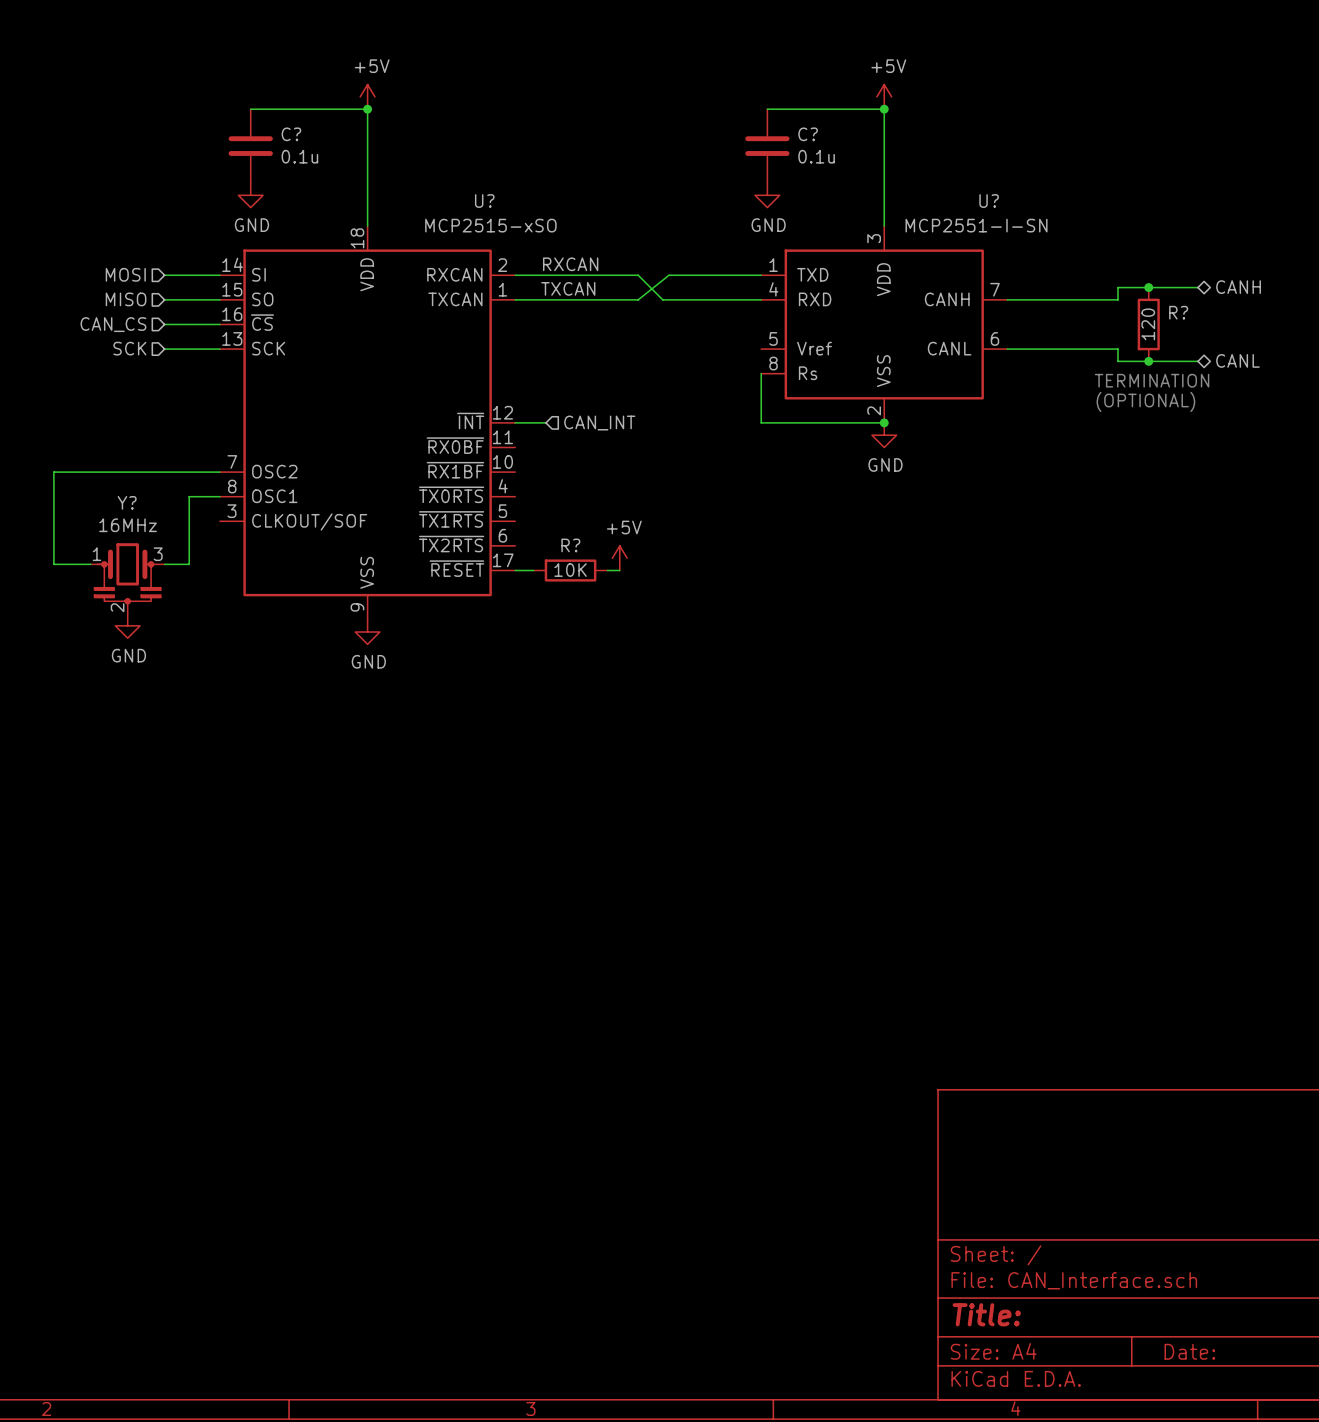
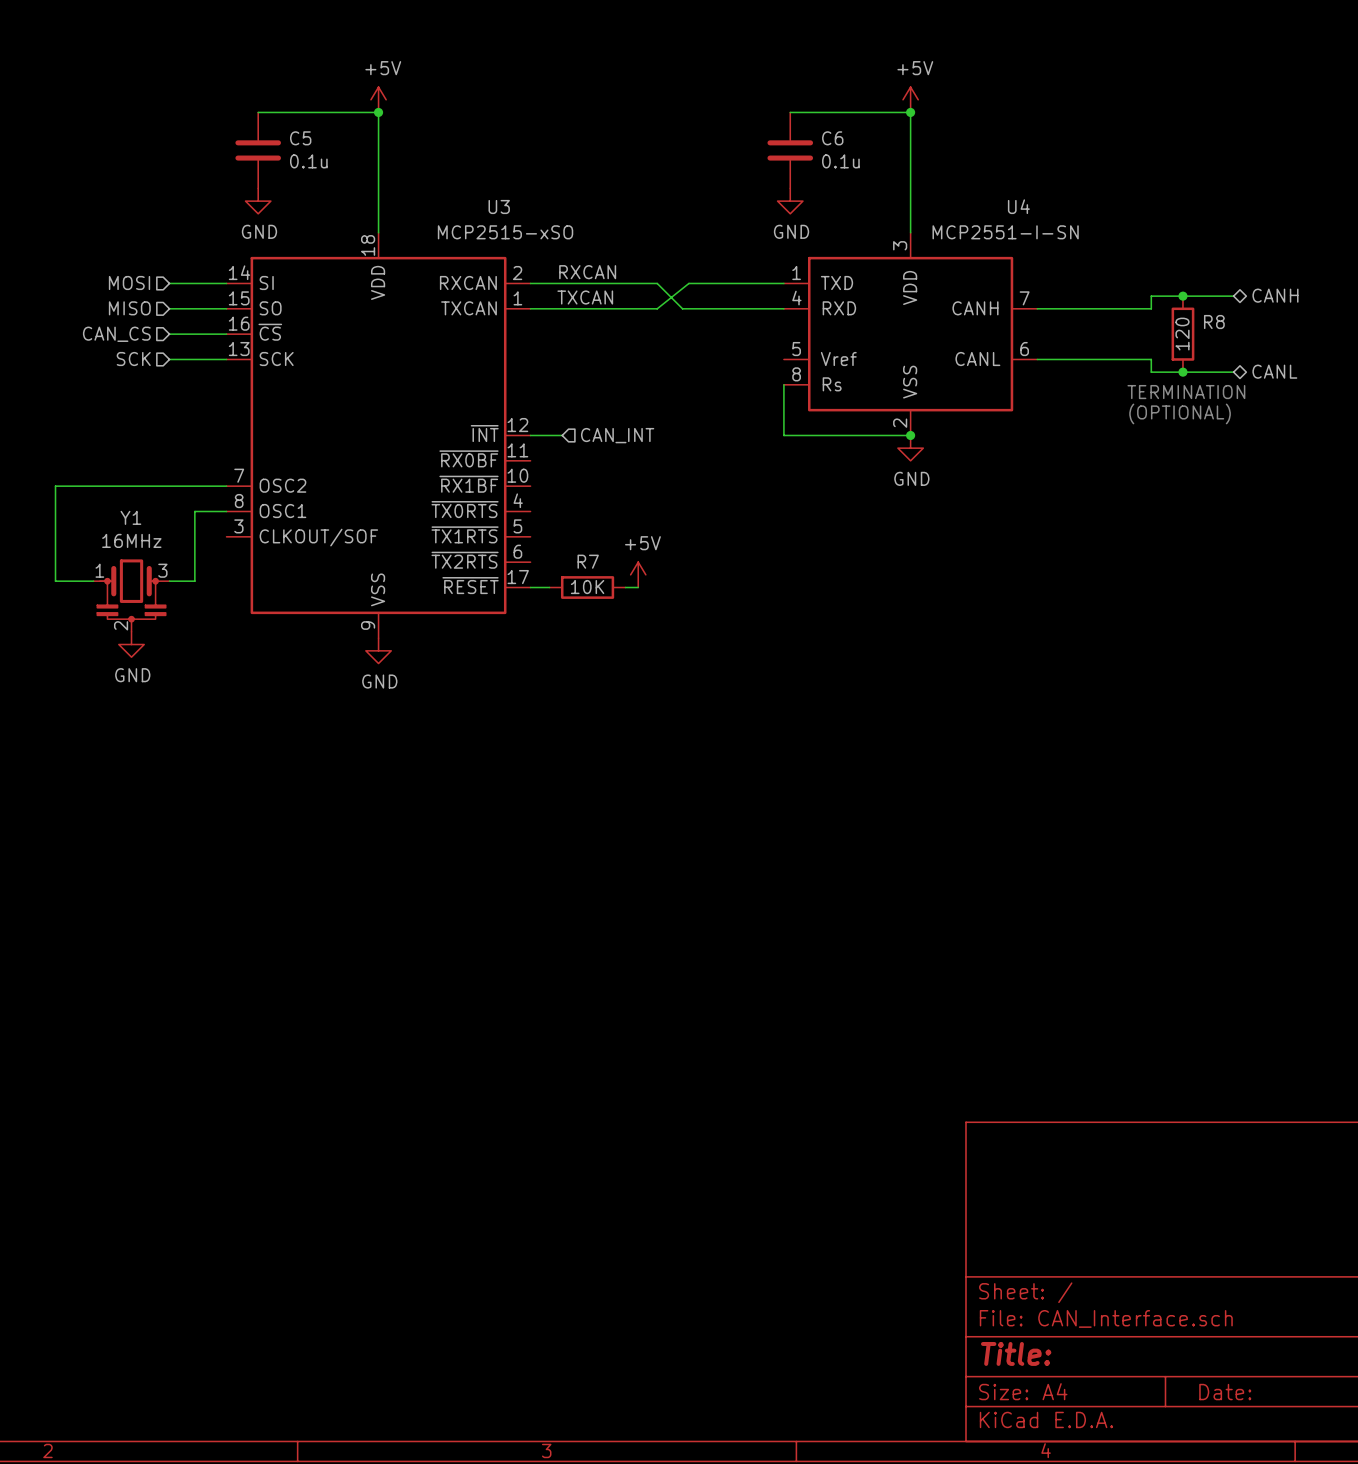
C? name: C? (291, 134) -> C5 (300, 138)
C? name: C? (808, 134) -> C6 (832, 138)
U? name: U? (484, 201) -> U3 (499, 206)
U? name: U? (989, 201) -> U4 (1018, 206)
R? name: R? (1178, 312) -> R8 (1214, 322)
Y? name: Y? (127, 502) -> Y1 (130, 517)
R? name: R? (570, 545) -> R7 (588, 561)

